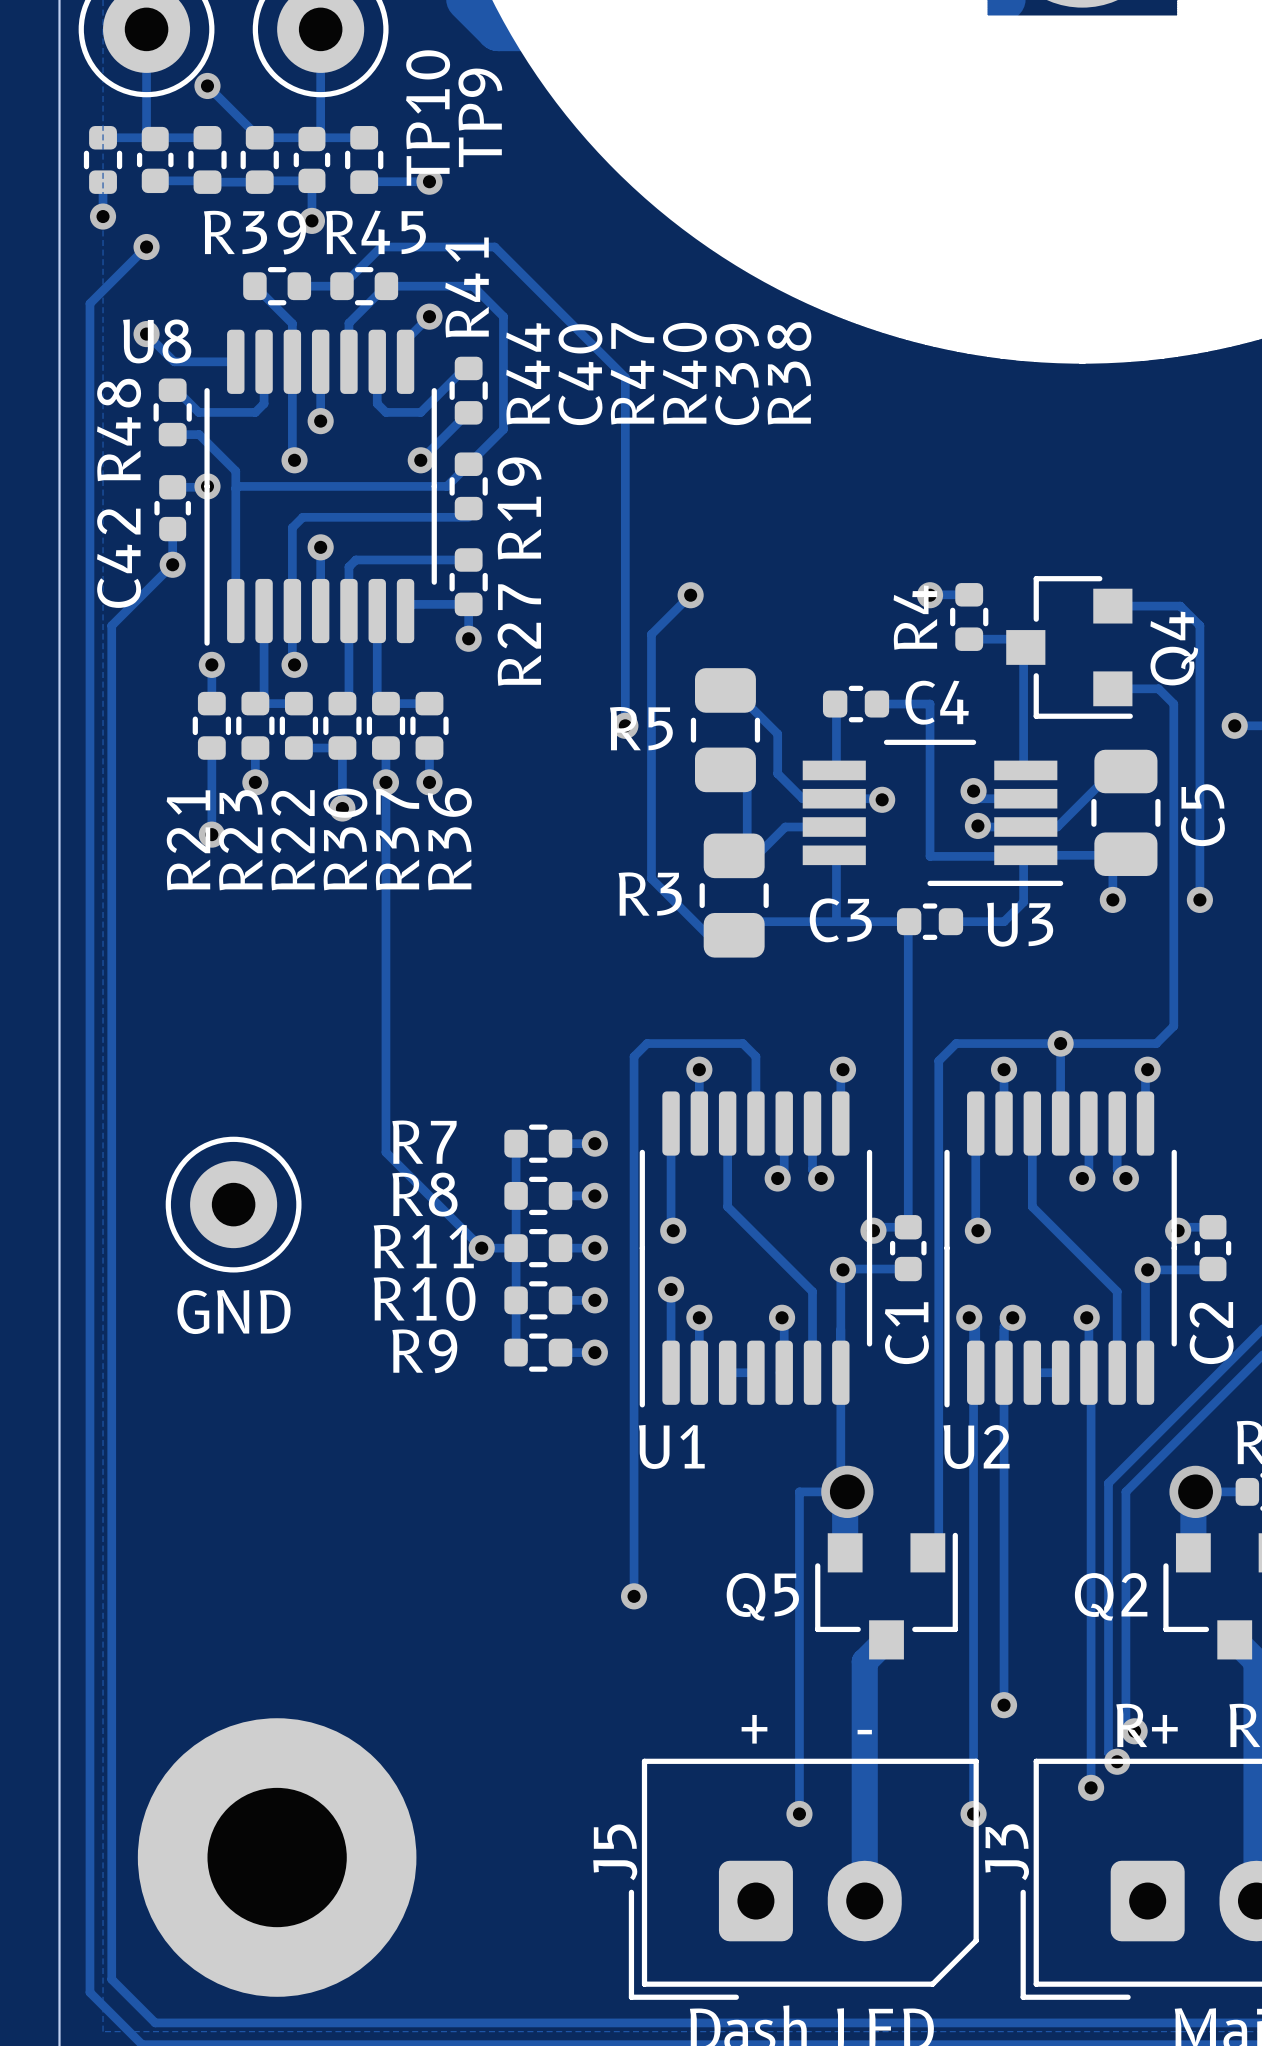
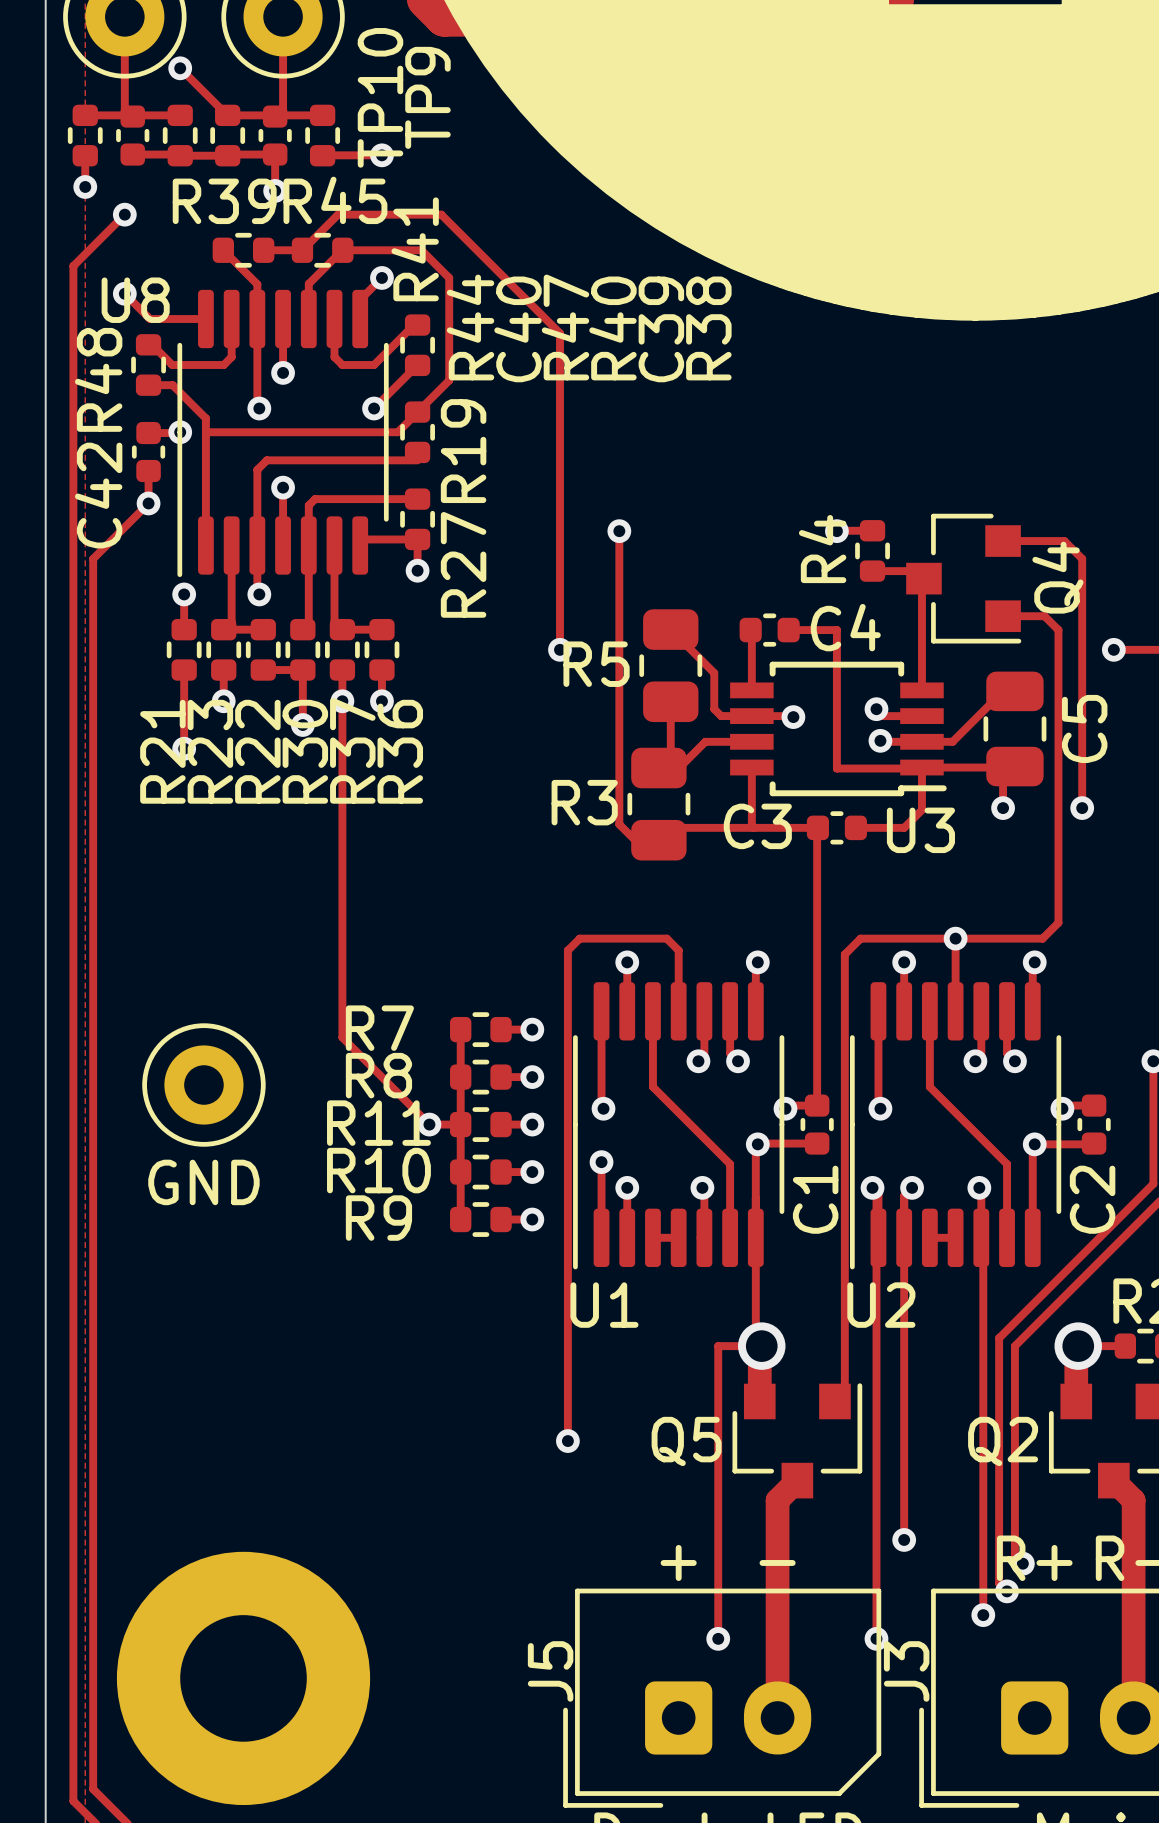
track: (690, 595) (651, 634) (651, 878) (690, 917) -> (619, 531) (619, 824)
R5 position: (725, 730) -> (670, 665)
track: (777, 733) (777, 773) (795, 791) -> (698, 657) (714, 673) (714, 709)
U3 footprint: [802, 739, 1064, 886] -> [730, 661, 947, 797]

